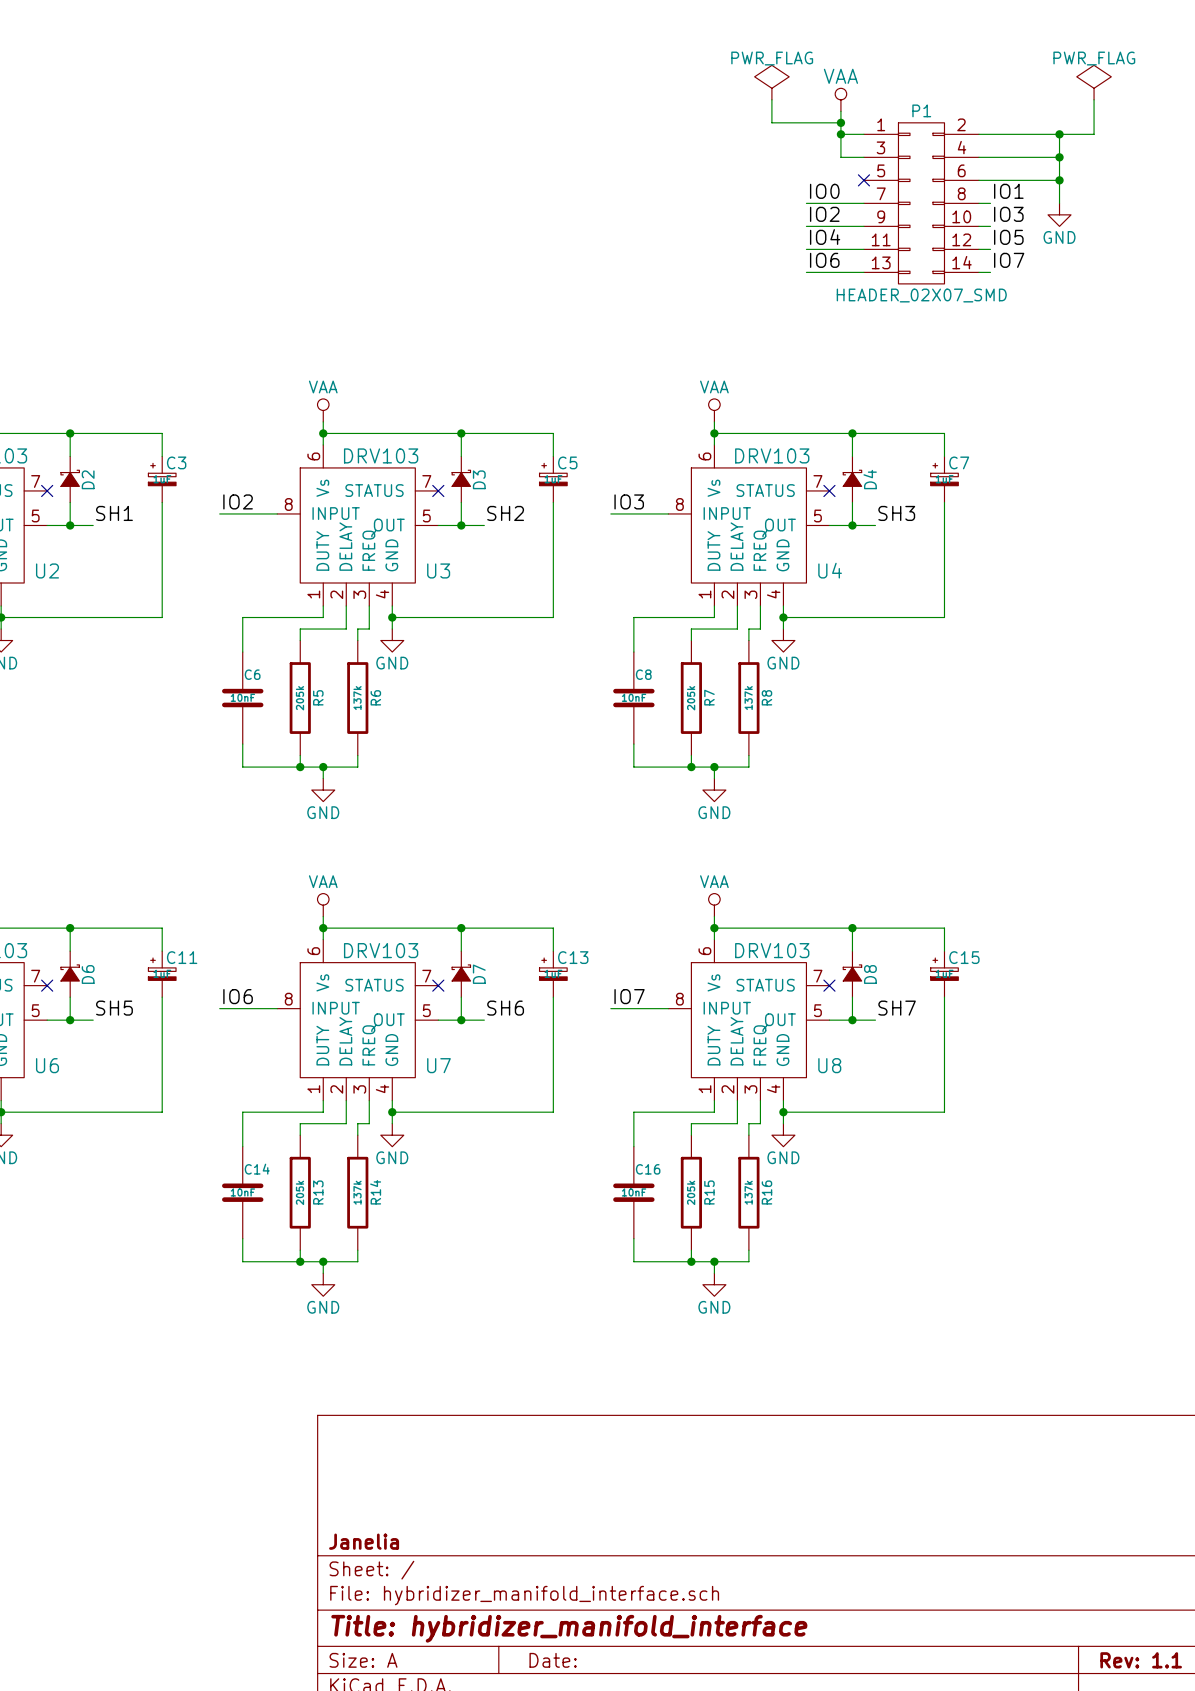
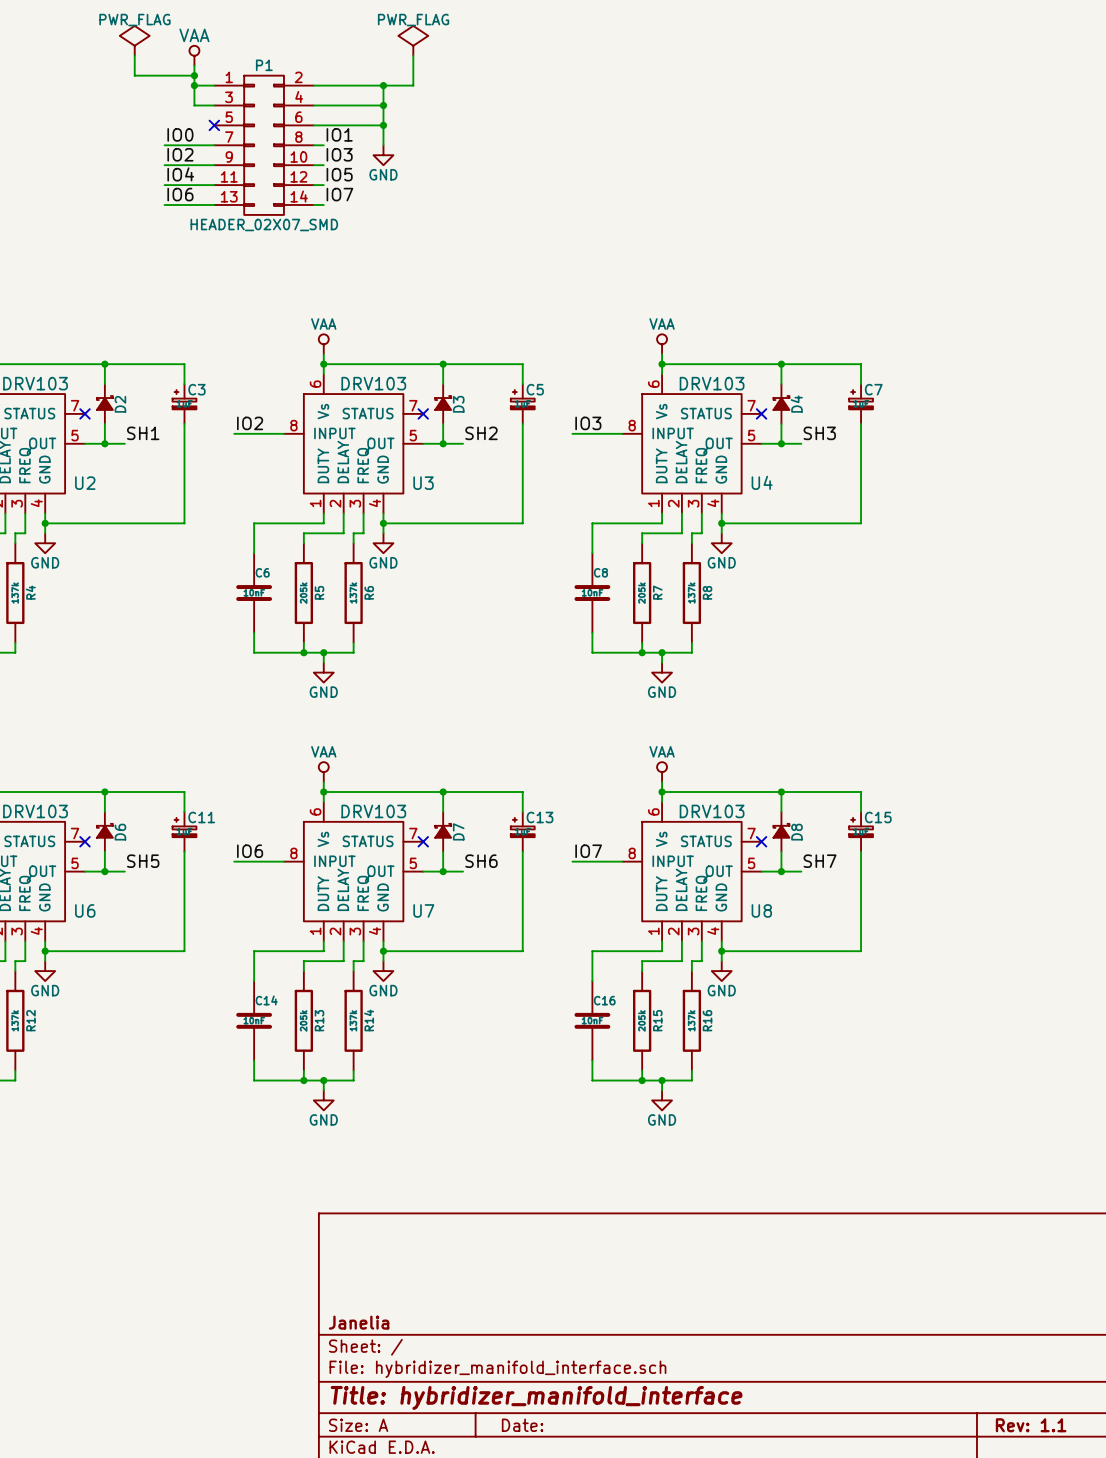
power symbol: none -> PWR_FLAG (134, 40)
power symbol: none -> PWR_FLAG (413, 40)
wire: none -> (134, 55) (134, 75) (194, 75)
power symbol: none -> VAA (194, 55)
wire: none -> (413, 55) (413, 85) (313, 85)
power symbol: PWR_FLAG (771, 82) -> none
power symbol: PWR_FLAG (1094, 82) -> none
wire: none -> (194, 65) (194, 105) (214, 105)
junction: none -> (194, 75)
wire: (771, 99) (771, 122) (840, 122) -> none
power symbol: VAA (840, 99) -> none
wire: (1094, 99) (1094, 134) (978, 134) -> none
wire: none -> (194, 85) (214, 85)
junction: none -> (194, 85)
wire: none -> (383, 85) (383, 145)
junction: none -> (383, 85)
wire: (840, 111) (840, 157) (863, 157) -> none
junction: (840, 122) -> none
wire: none -> (313, 105) (383, 105)
junction: none -> (383, 105)
wire: (840, 134) (863, 134) -> none
junction: (840, 134) -> none
wire: (1059, 134) (1059, 203) -> none
junction: (1059, 134) -> none
no-connect mark: none -> (214, 125)
wire: none -> (313, 125) (383, 125)
junction: none -> (383, 125)
wire: (978, 157) (1059, 157) -> none
junction: (1059, 157) -> none
label: none -> IO0 (180, 134)
label: none -> IO1 (339, 134)
wire: none -> (164, 145) (214, 145)
wire: none -> (313, 145) (323, 145)
no-connect mark: (863, 180) -> none
wire: (978, 180) (1059, 180) -> none
junction: (1059, 180) -> none
label: none -> IO2 (180, 154)
label: none -> IO3 (339, 154)
power symbol: none -> GND (383, 155)
label: IO0 (824, 191) -> none
label: IO1 (1008, 191) -> none
wire: none -> (164, 165) (214, 165)
wire: none -> (313, 165) (323, 165)
wire: (806, 203) (863, 203) -> none
P1 position: (921, 203) -> (264, 145)
wire: (978, 203) (990, 203) -> none
label: none -> IO4 (180, 174)
label: none -> IO5 (339, 174)
label: IO2 (824, 214) -> none
label: IO3 (1008, 214) -> none
power symbol: GND (1059, 214) -> none
wire: none -> (164, 185) (214, 185)
wire: none -> (313, 185) (323, 185)
wire: (806, 226) (863, 226) -> none
wire: (978, 226) (990, 226) -> none
label: none -> IO6 (180, 194)
label: none -> IO7 (339, 194)
label: IO4 (825, 237) -> none
label: IO5 (1008, 237) -> none
wire: none -> (164, 204) (214, 204)
wire: none -> (313, 204) (323, 204)
wire: (806, 249) (863, 249) -> none
wire: (978, 249) (990, 249) -> none
label: IO6 (824, 260) -> none
label: IO7 (1009, 260) -> none
wire: (806, 272) (863, 272) -> none
wire: (978, 272) (990, 272) -> none

